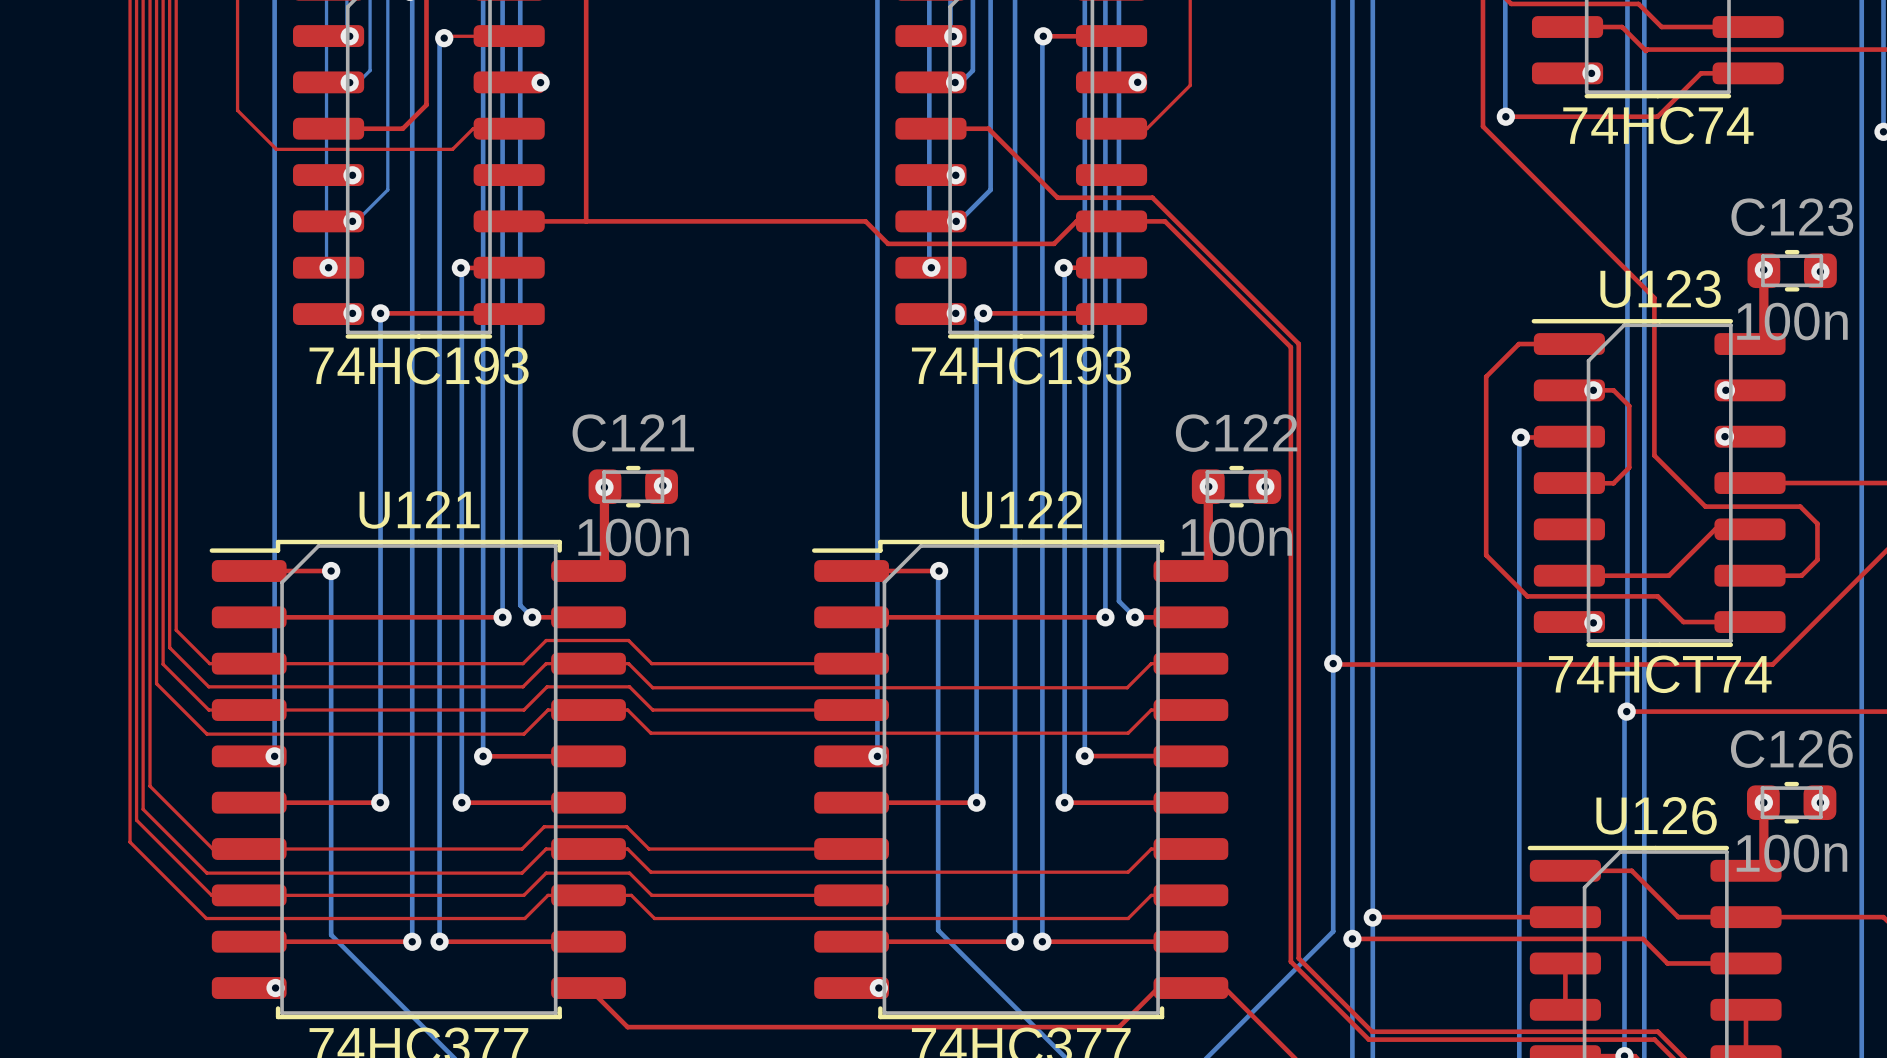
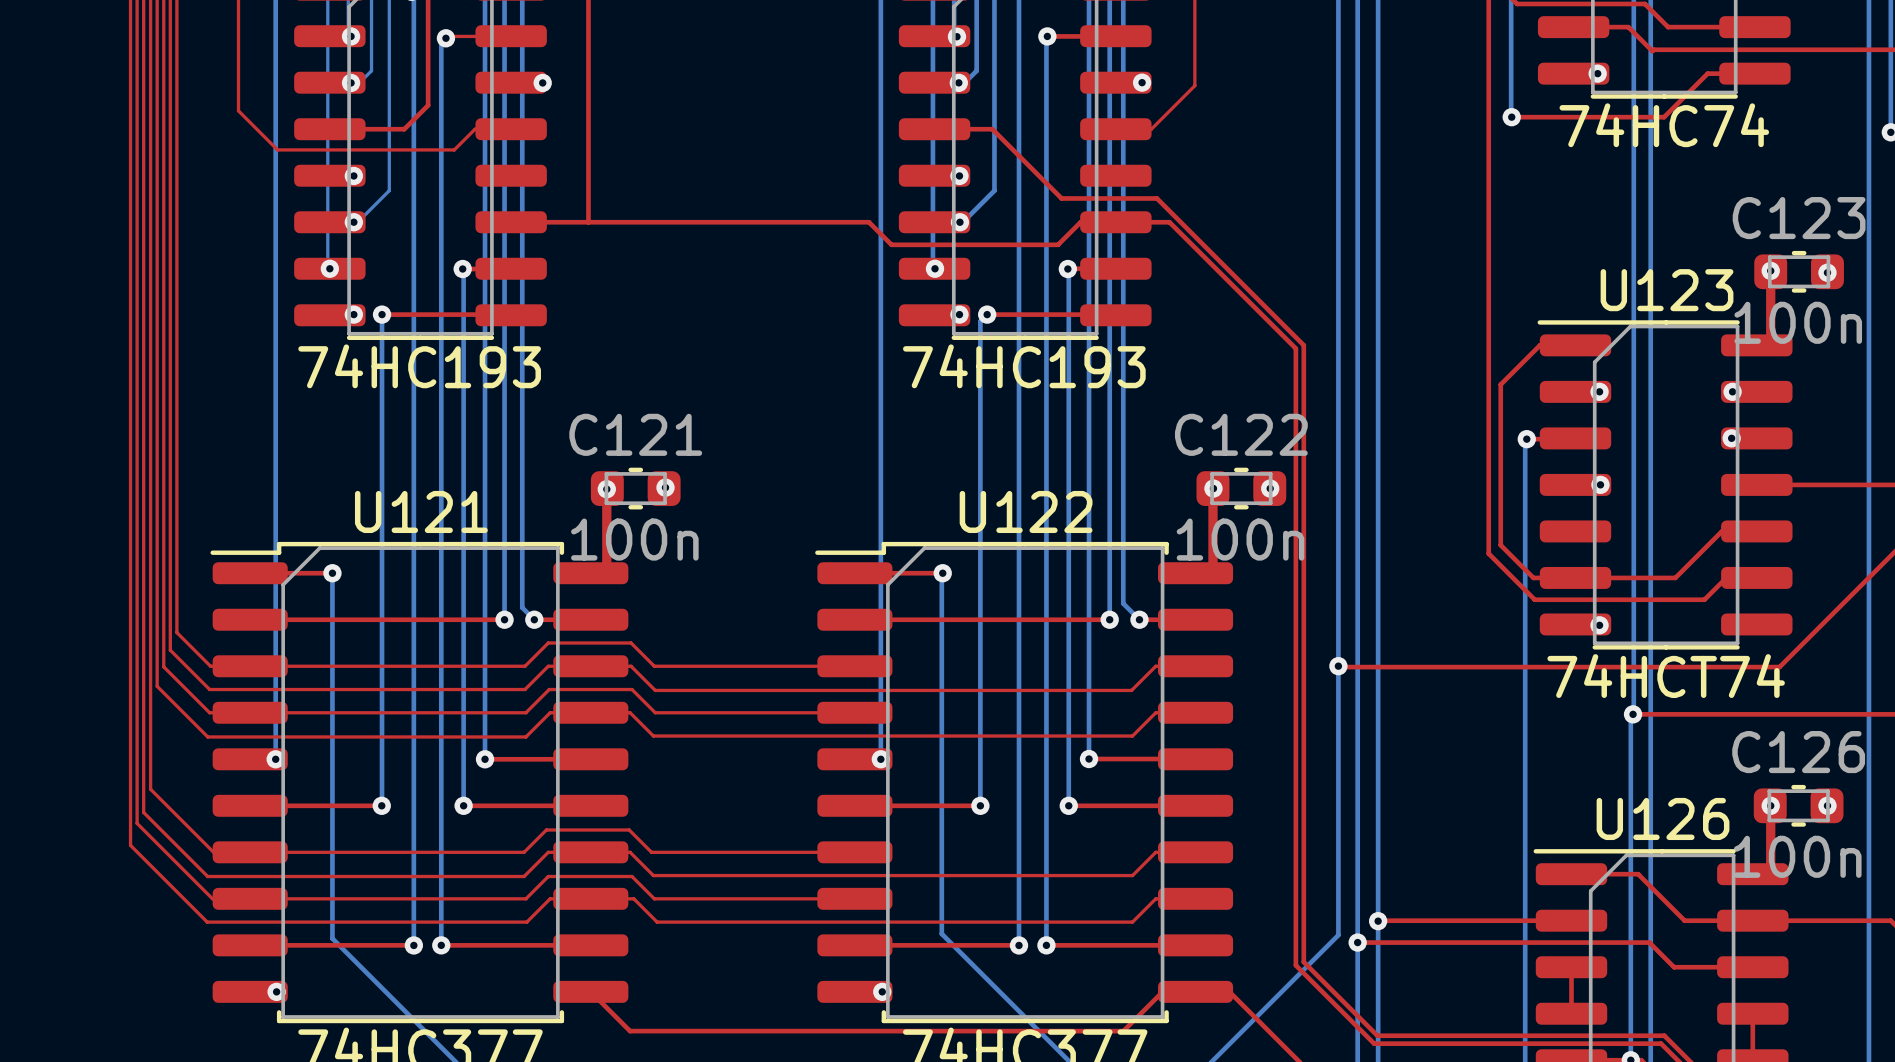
top track: (1482, 126) (1654, 297) (1654, 455) (1705, 506) (1800, 506) (1817, 523) (1817, 559) (1801, 575) (1749, 575) -> (1488, 127) (1488, 553) (1534, 599) (1704, 599) (1726, 577) (1756, 577)
top track: (1533, 344) (1518, 344) (1486, 376) (1486, 555) (1527, 596) (1657, 596) (1683, 622) (1749, 622) -> (1539, 345) (1500, 384) (1500, 545) (1533, 577) (1575, 577)
top track: (1569, 390) (1613, 390) (1629, 405) (1629, 467) (1613, 483) (1569, 483) -> none
via: none -> (1600, 484)

